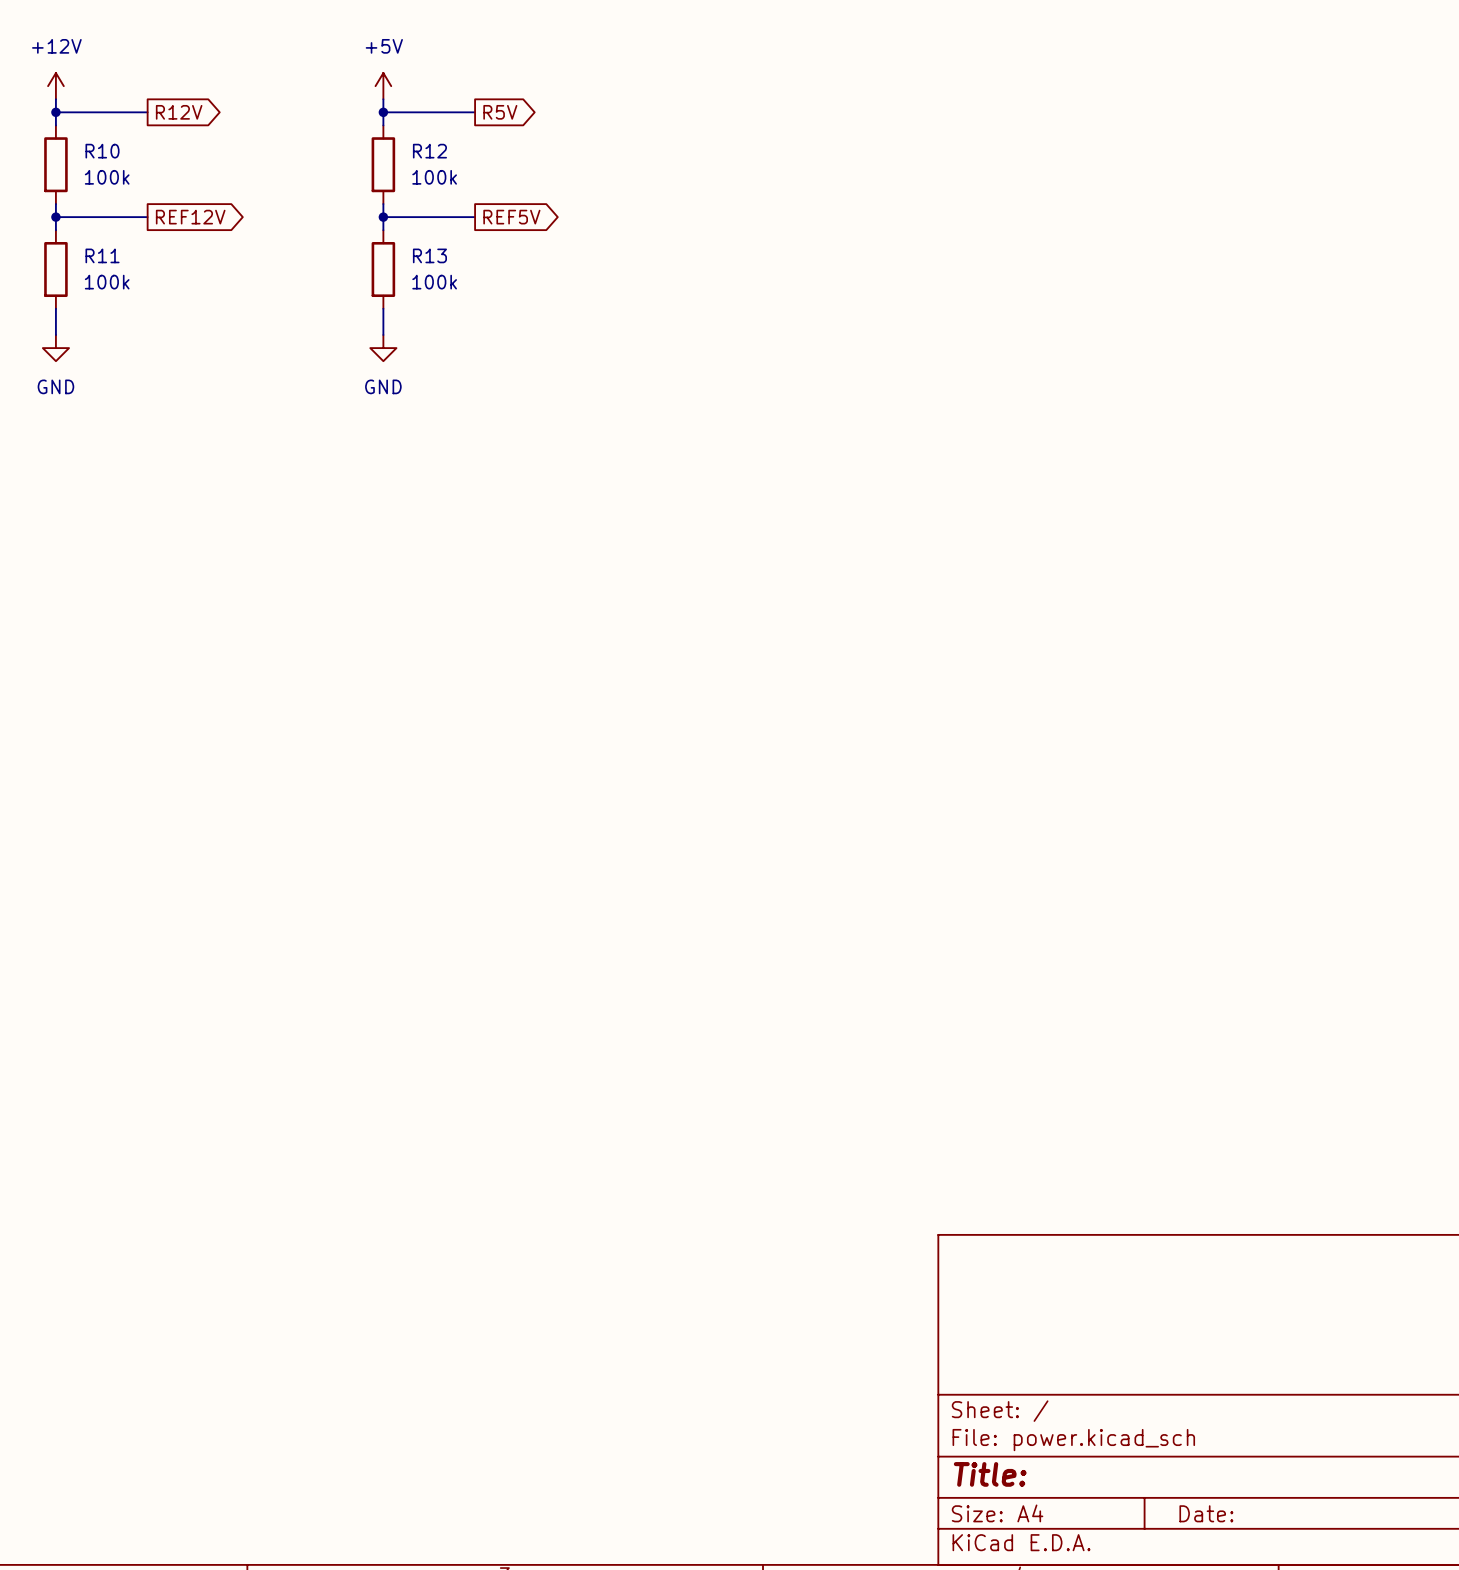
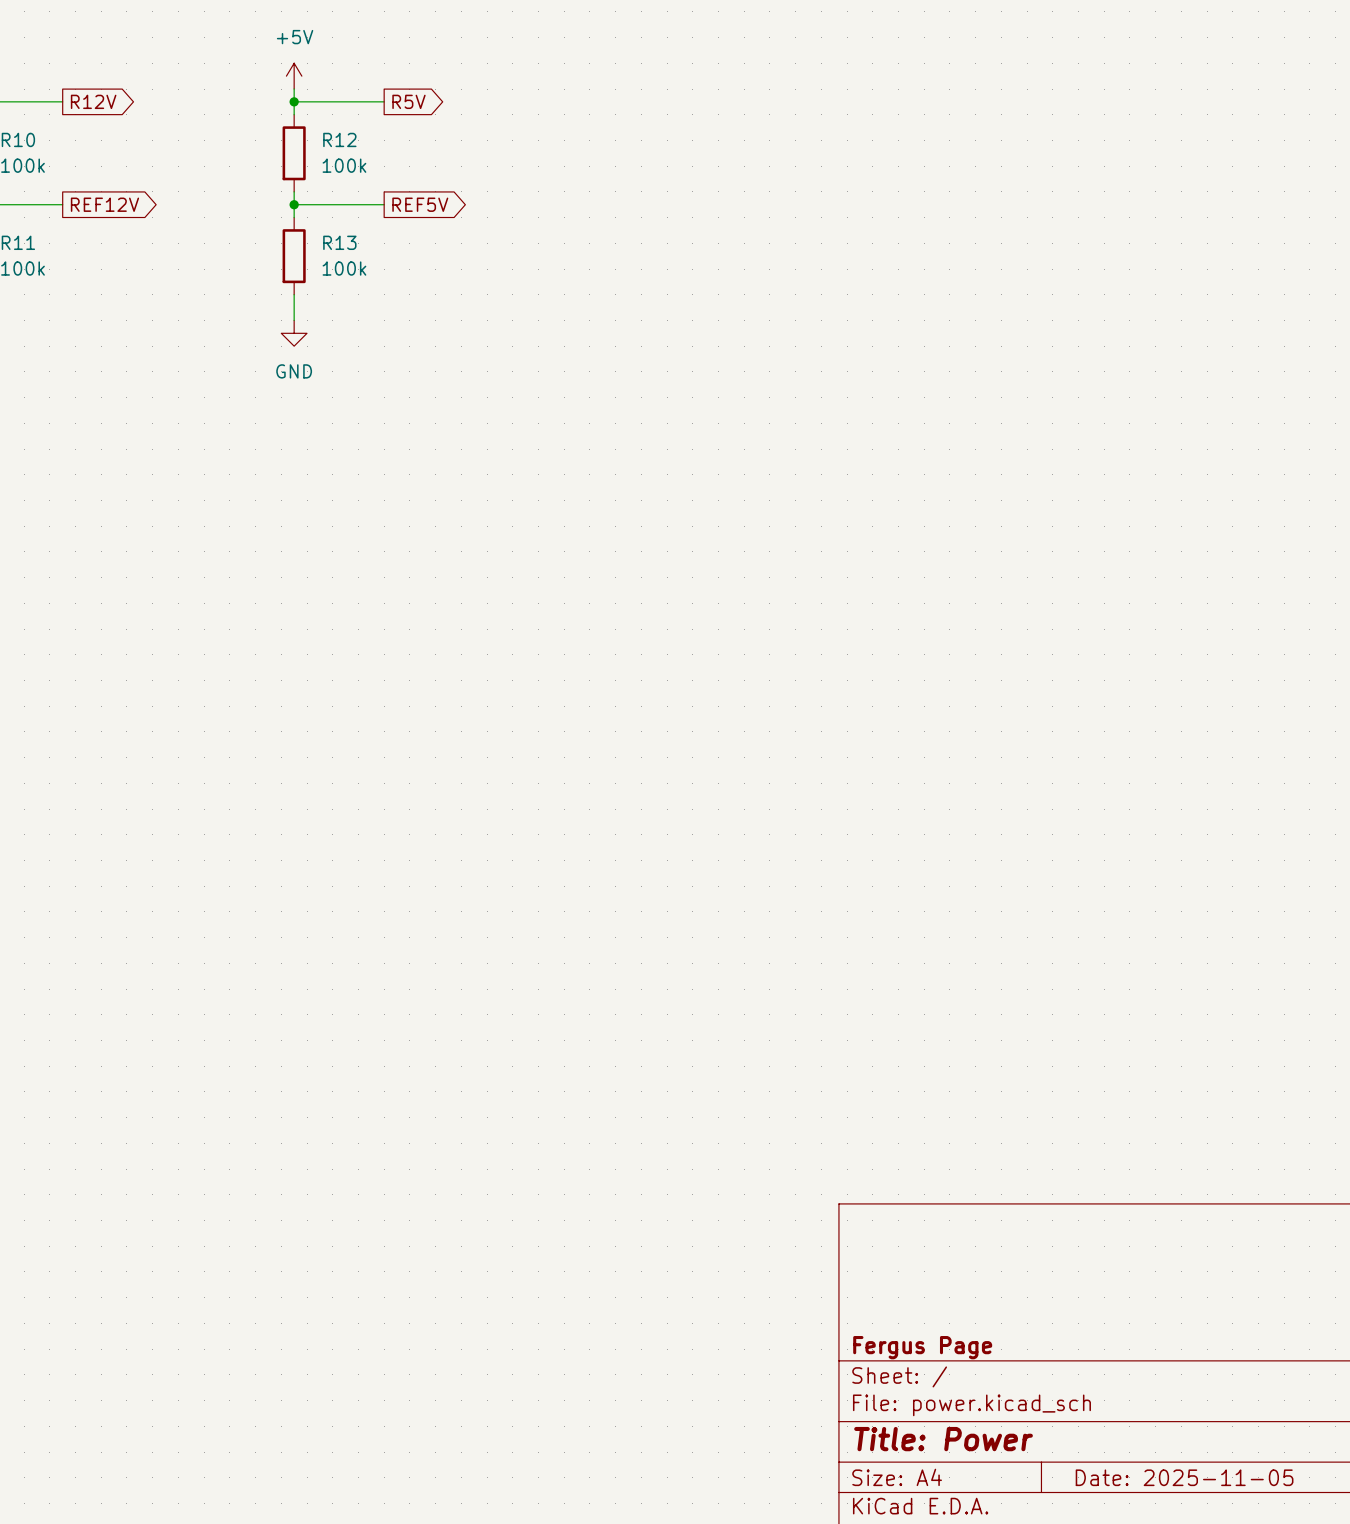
title block: none -> Fergus Page (922, 1347)
title block: Title: (990, 1474) -> Title: Power (943, 1439)
title block: Date: (1206, 1513) -> Date: 2025-11-05 (1184, 1477)

